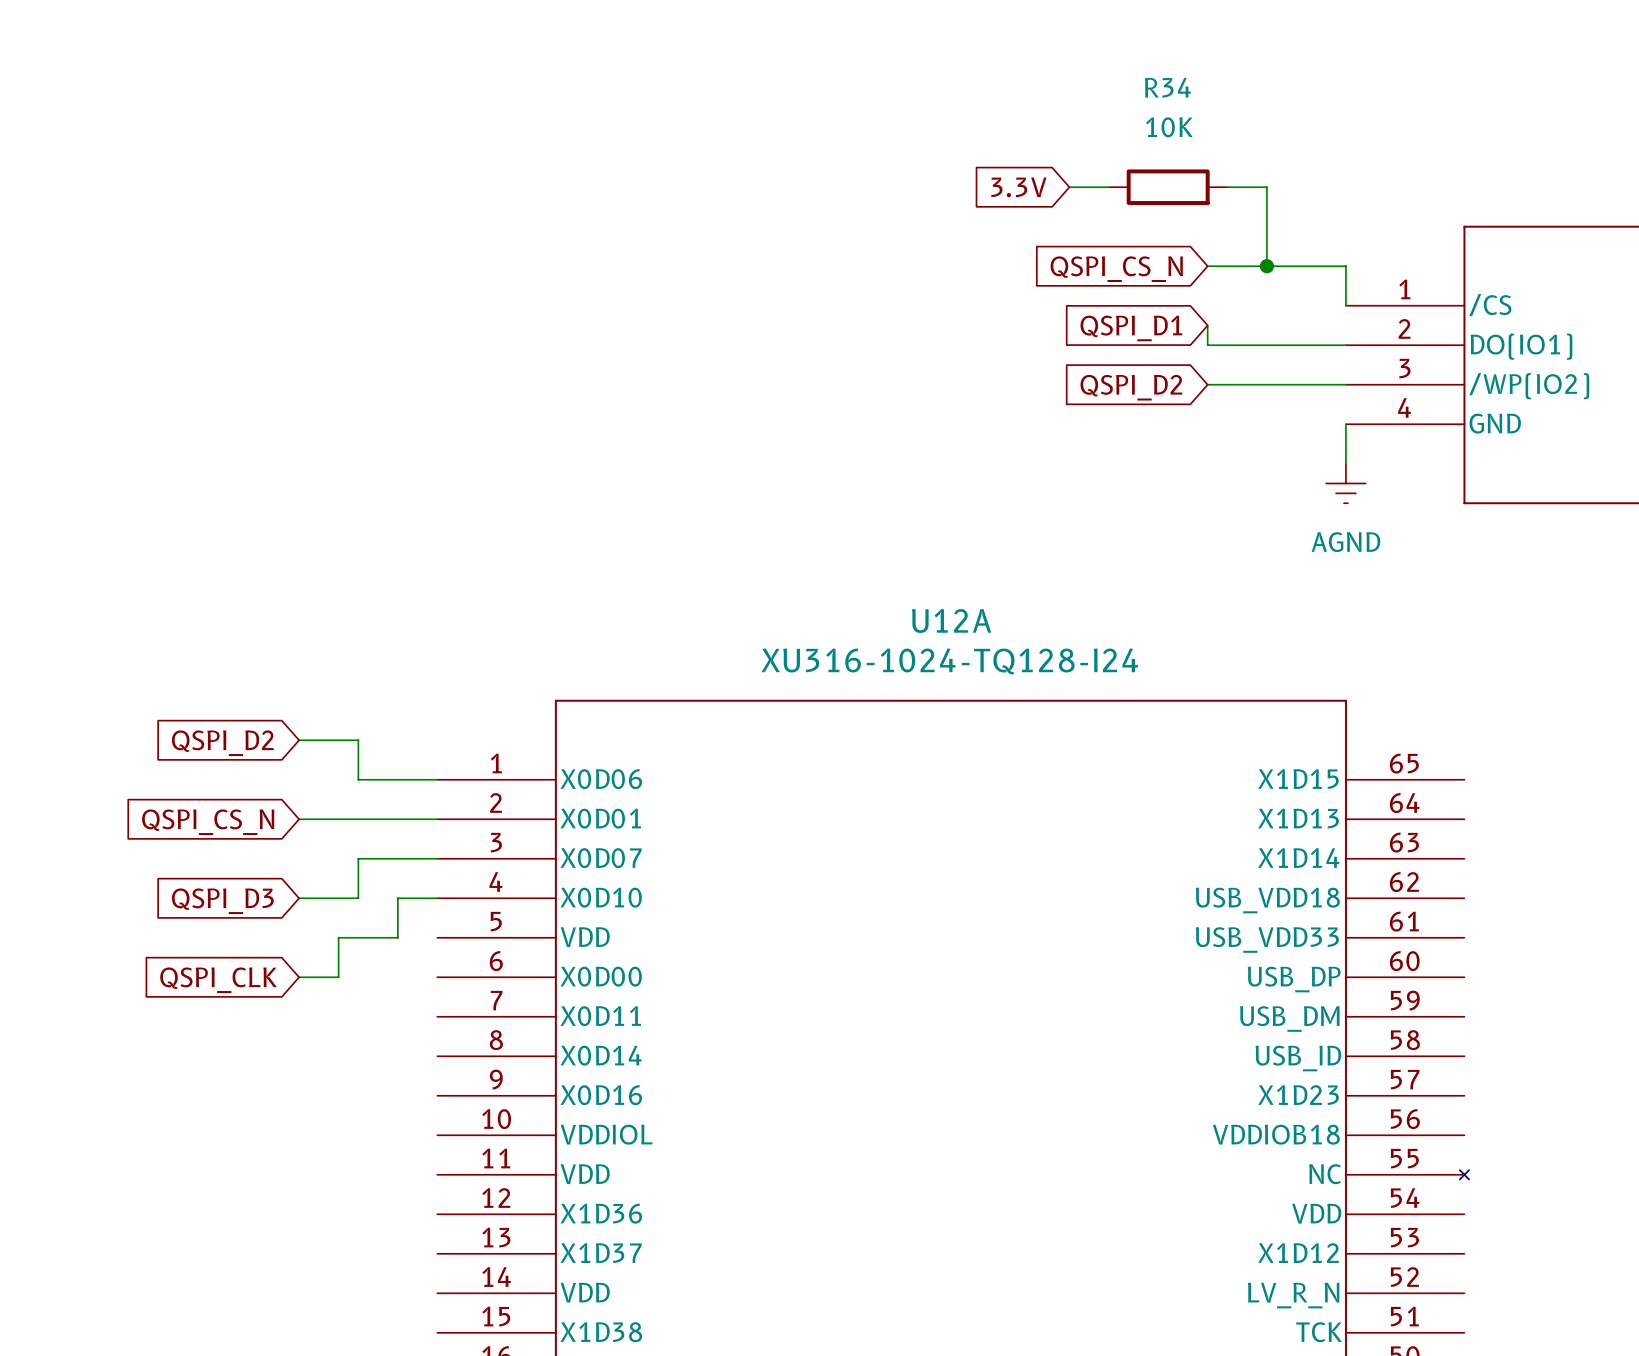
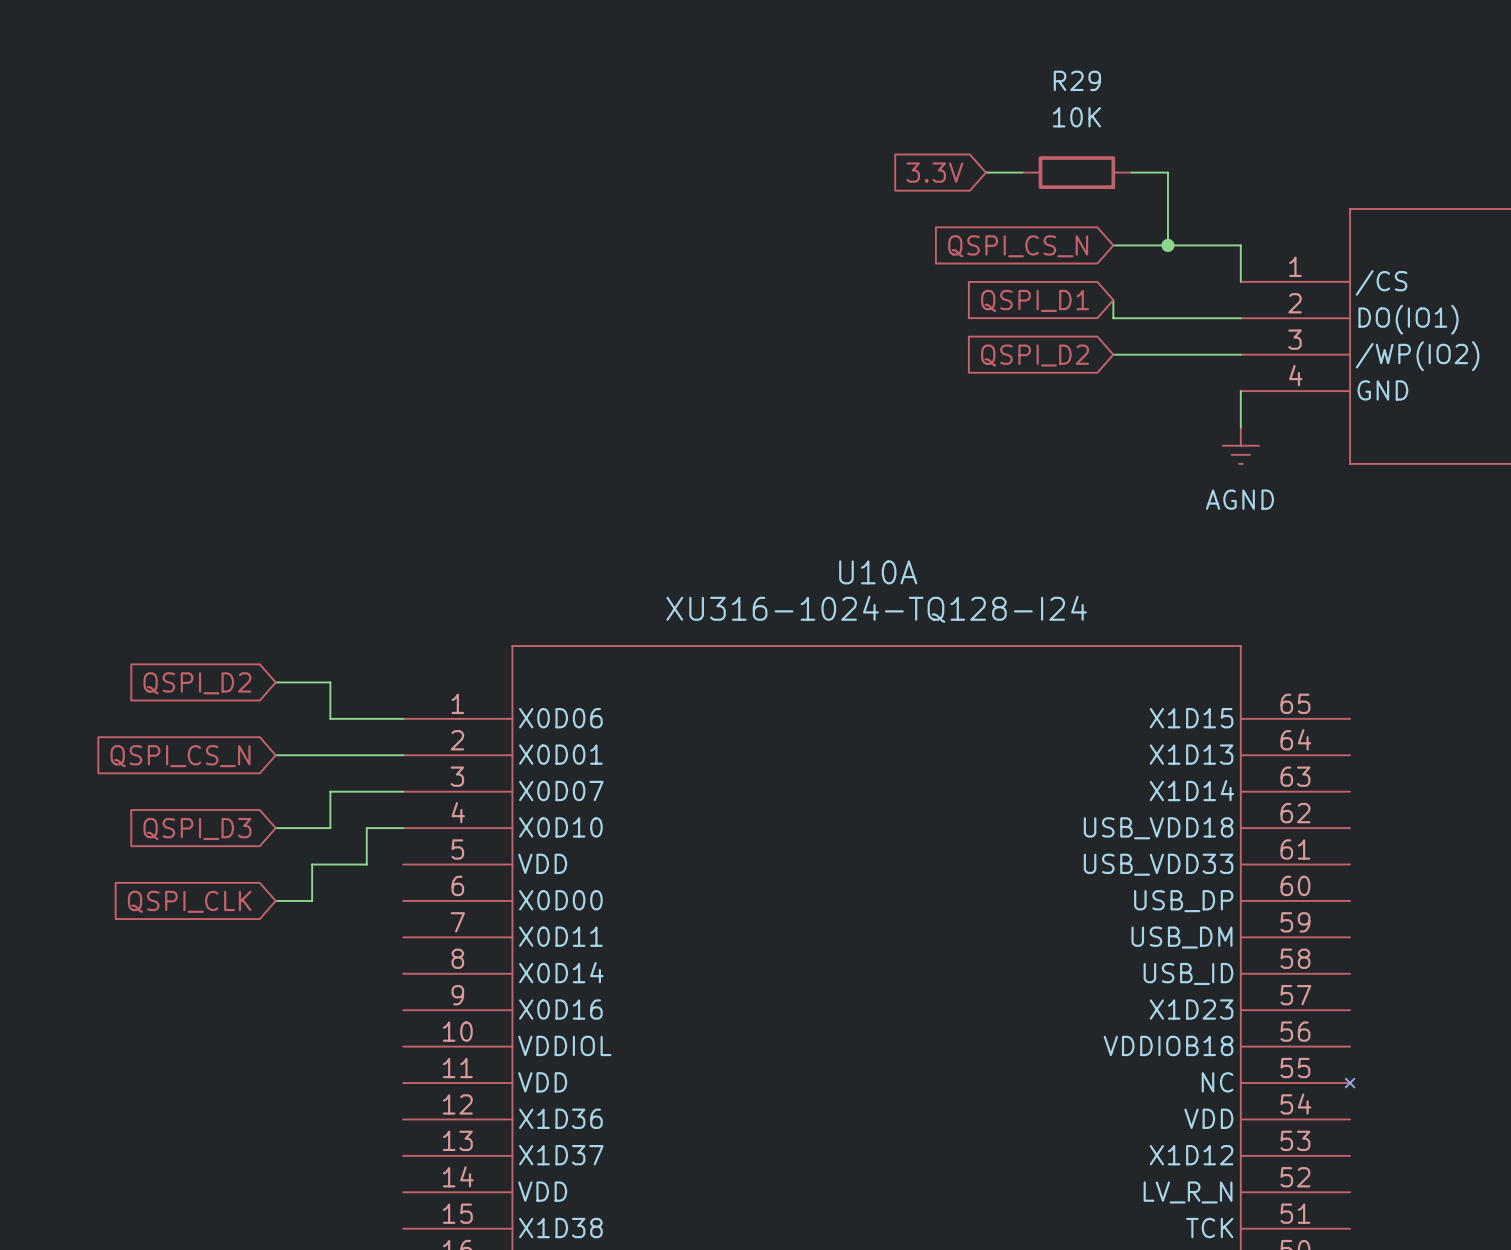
R34 name: R34 (1167, 87) -> R29 (1077, 80)
U12A name: U12A (951, 620) -> U10A (878, 572)

